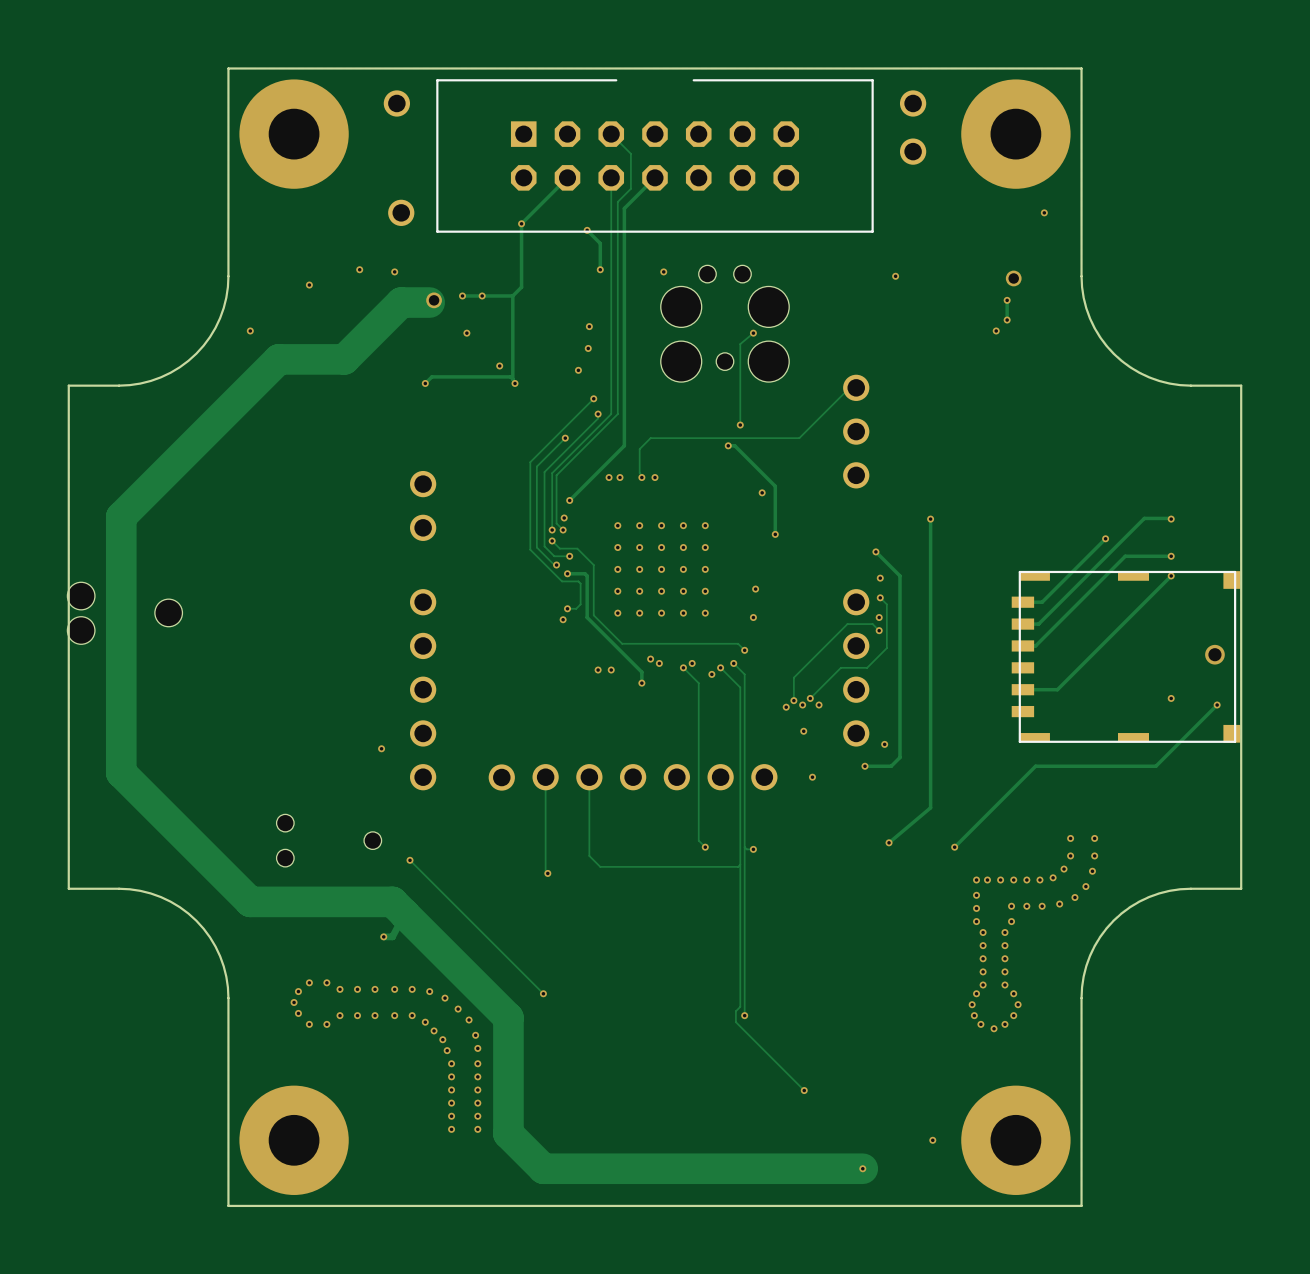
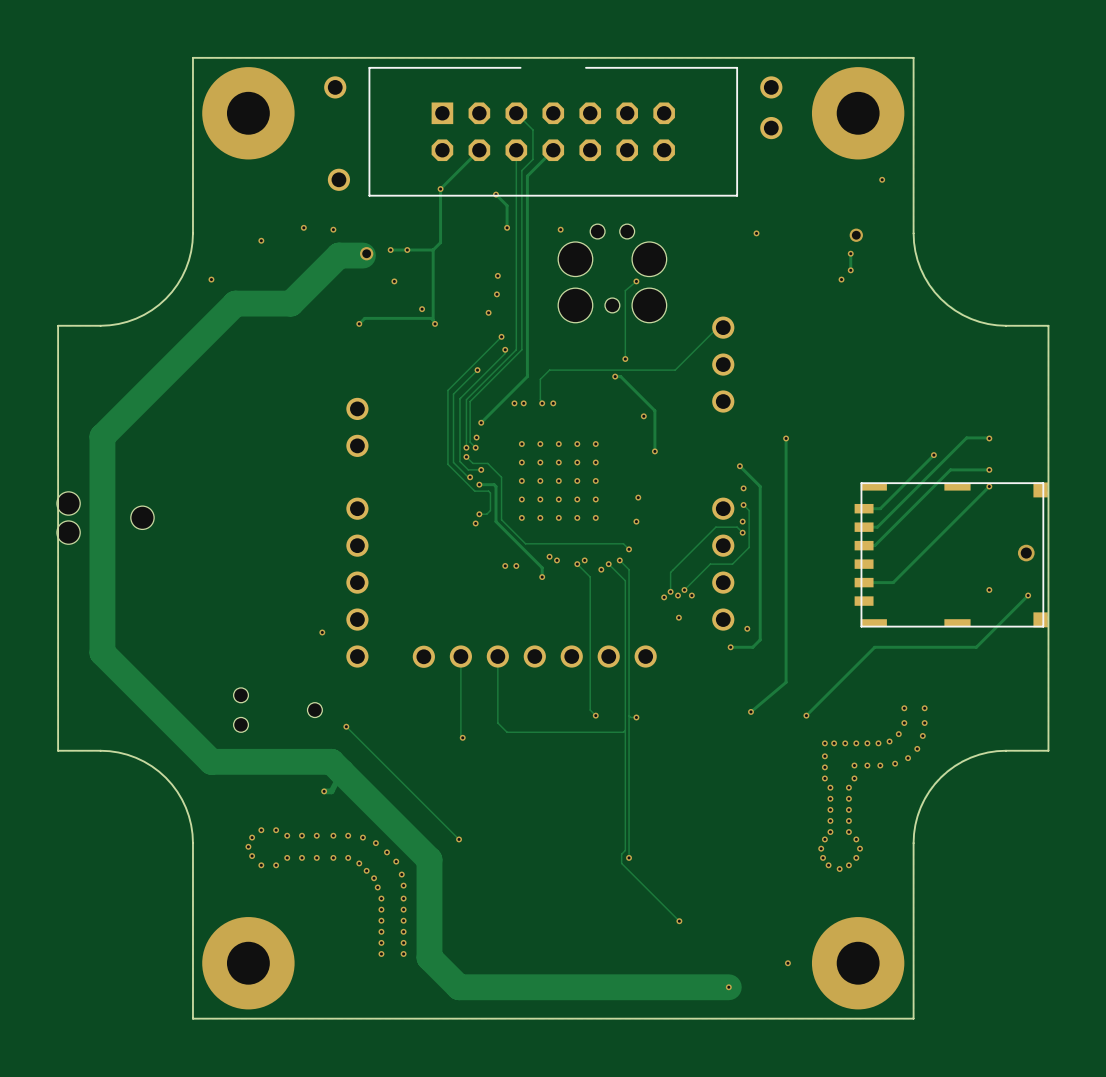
via: (812, 777) -> none

